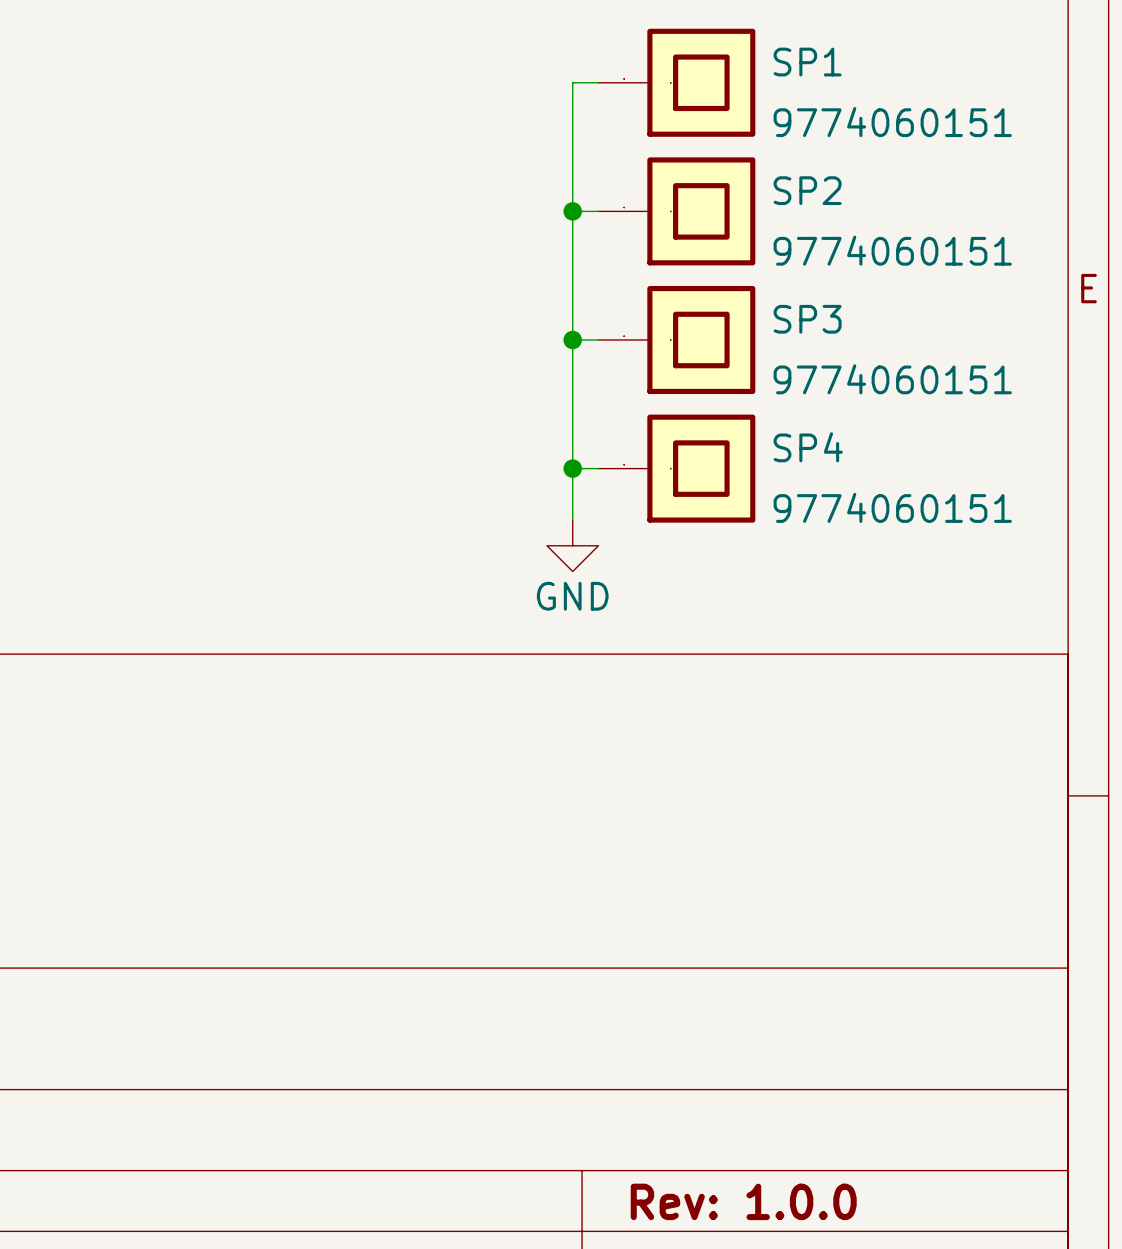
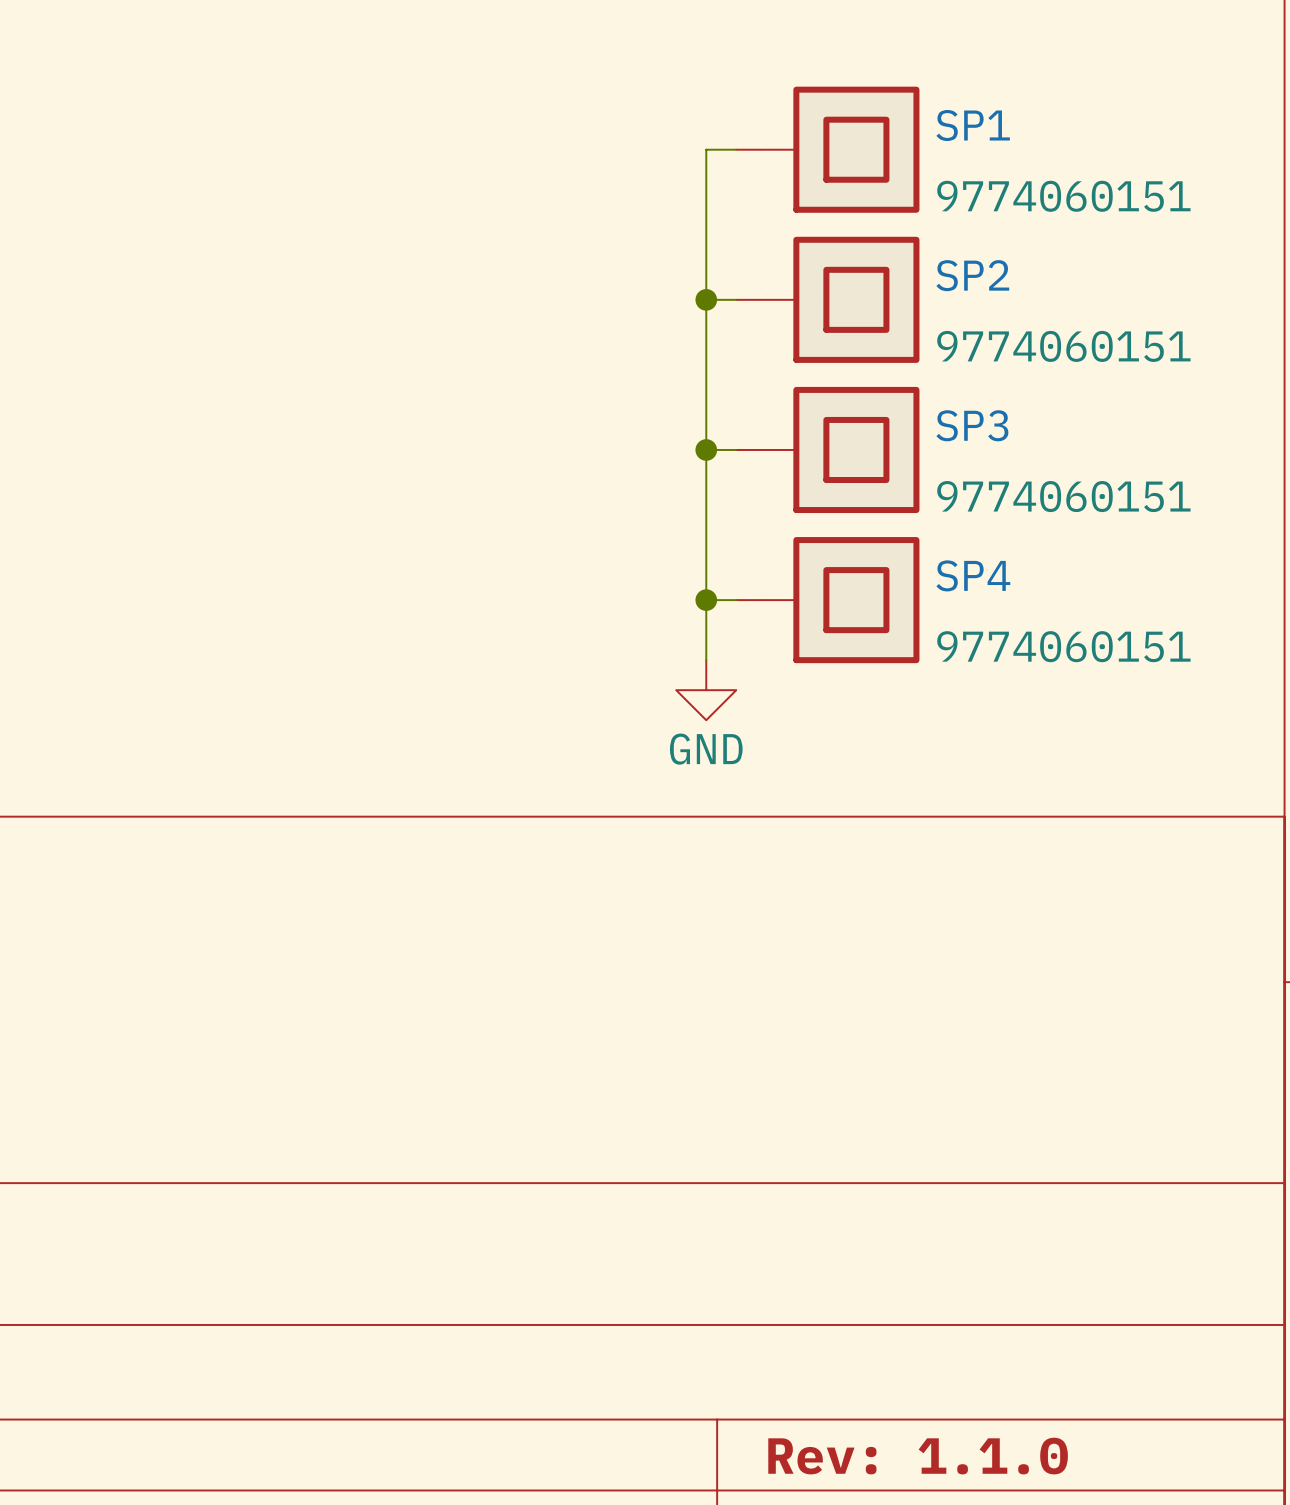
title block: Rev: 1.0.0 (743, 1201) -> Rev: 1.1.0 (918, 1456)

